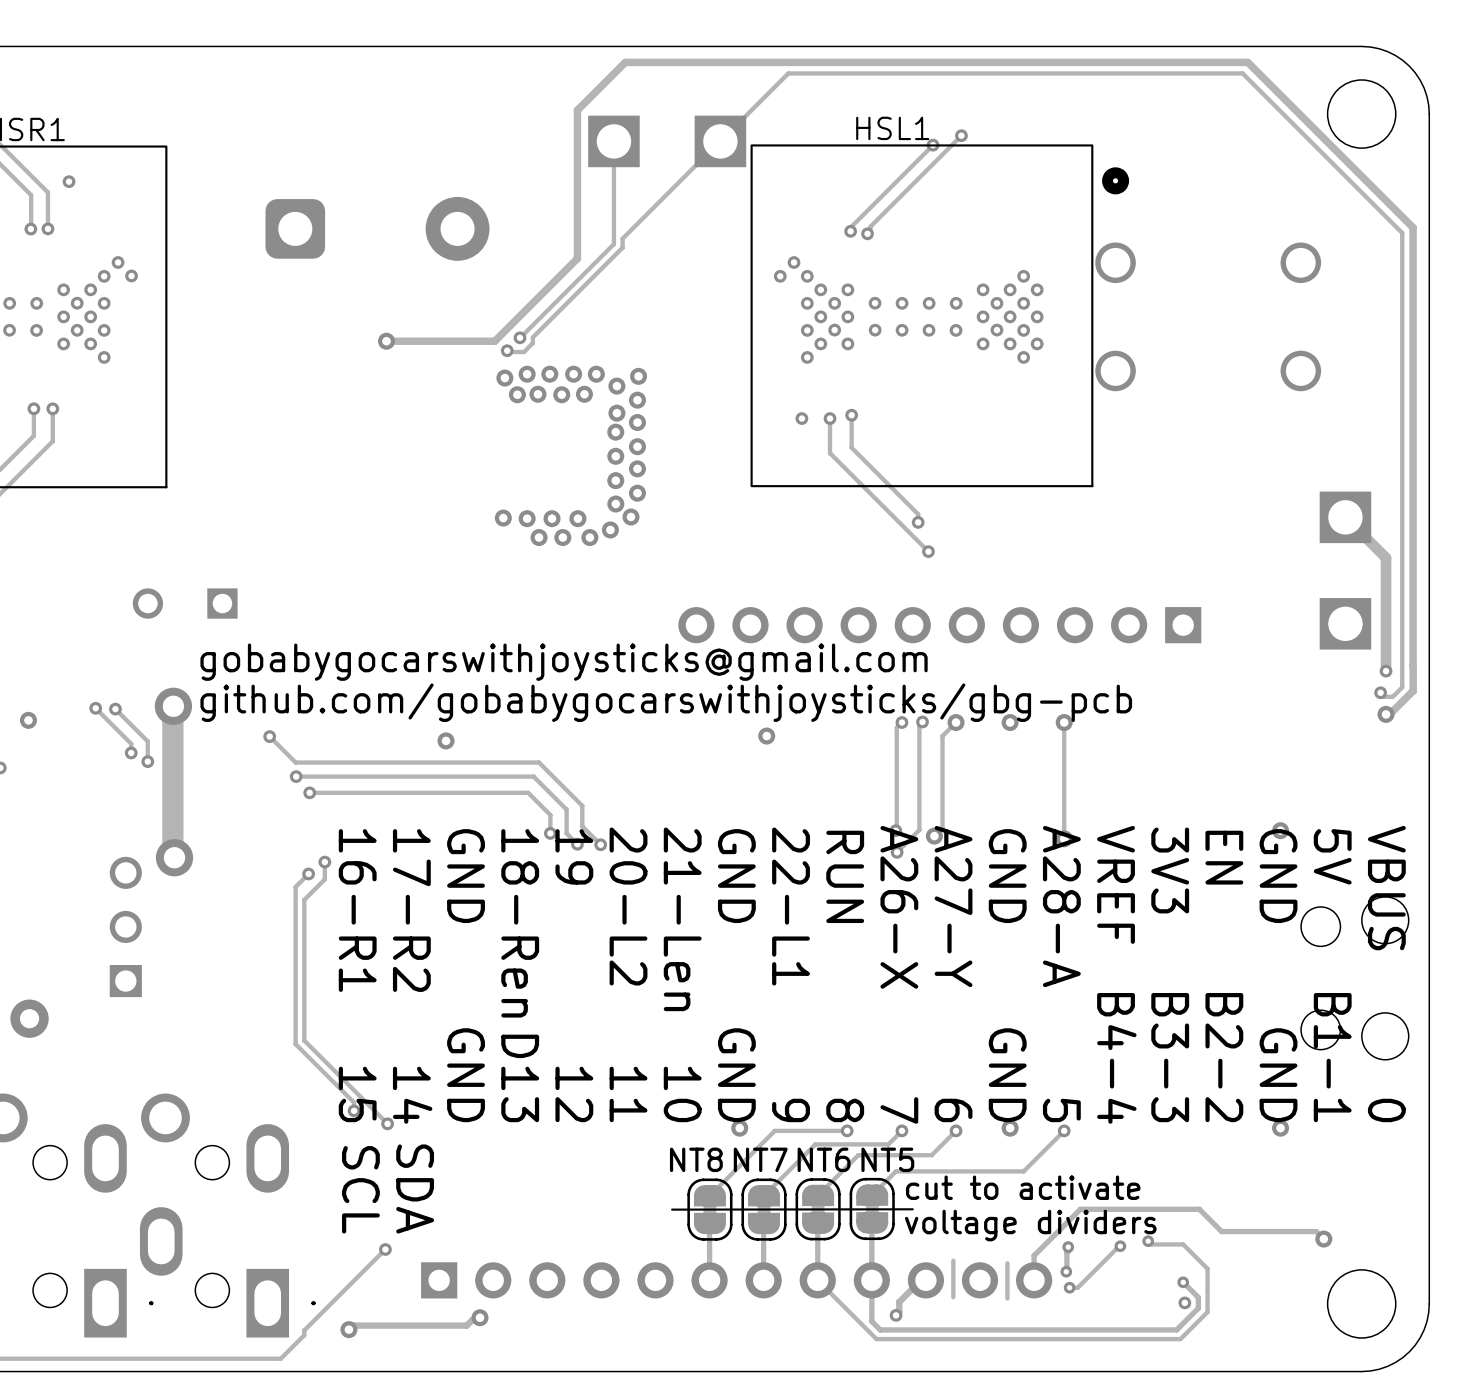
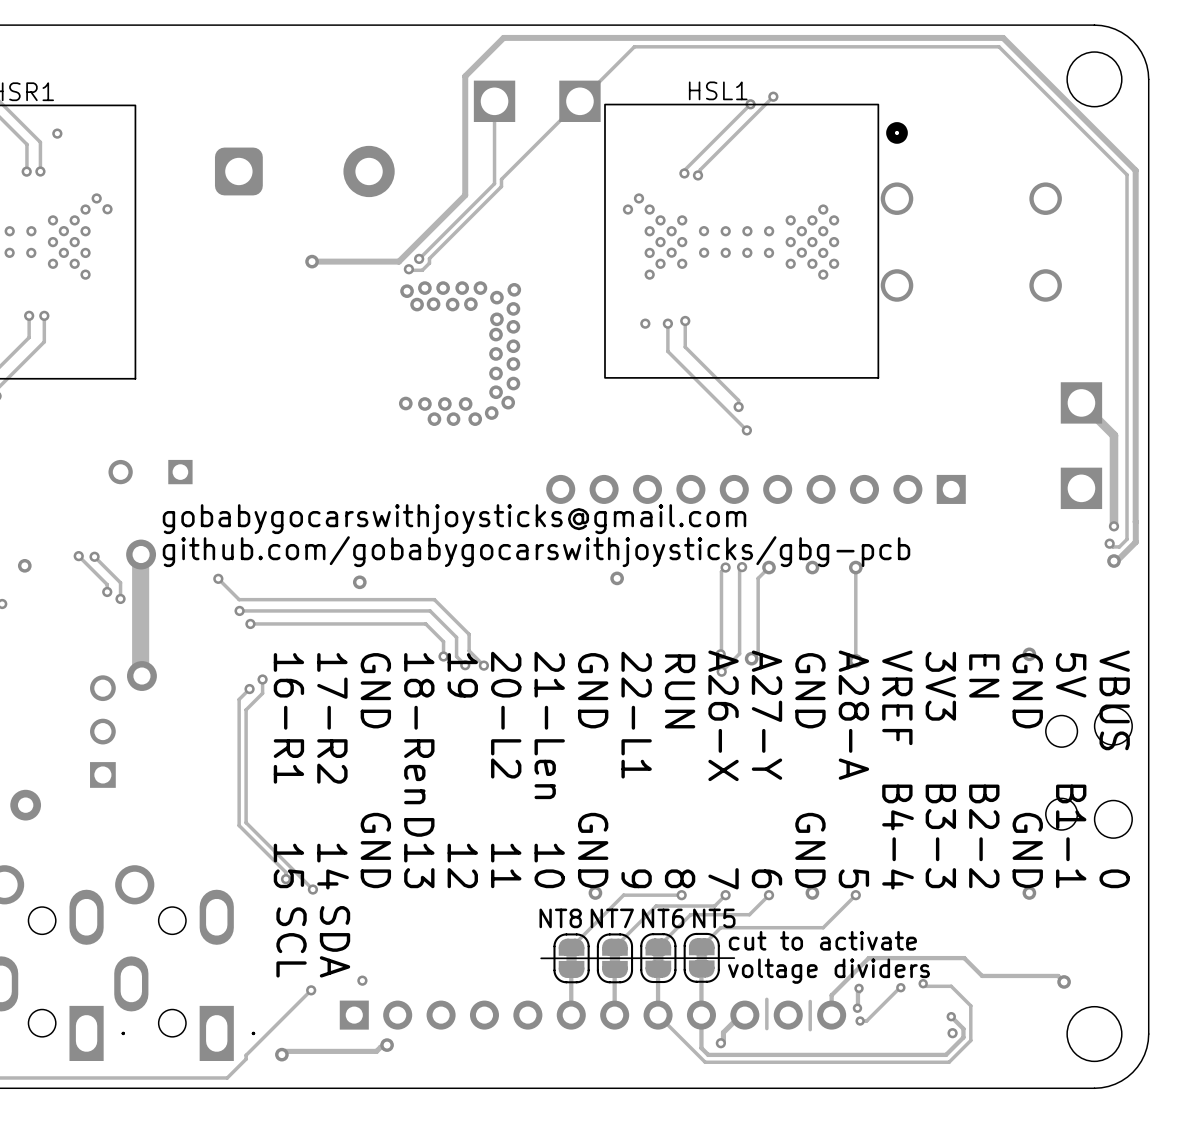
via: none -> (362, 980)

